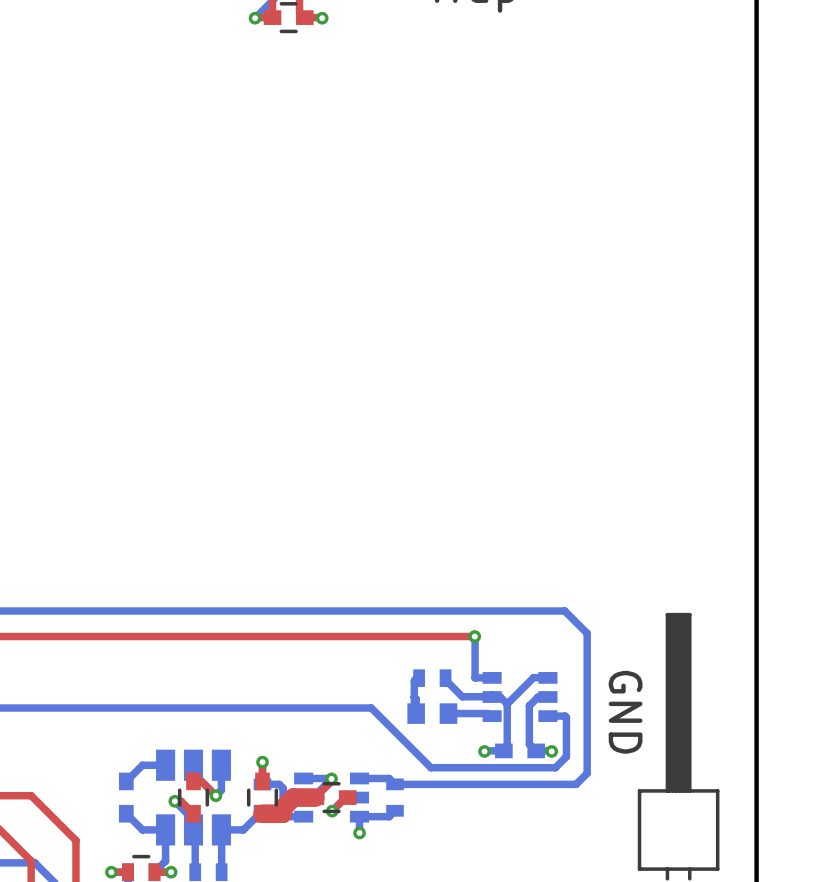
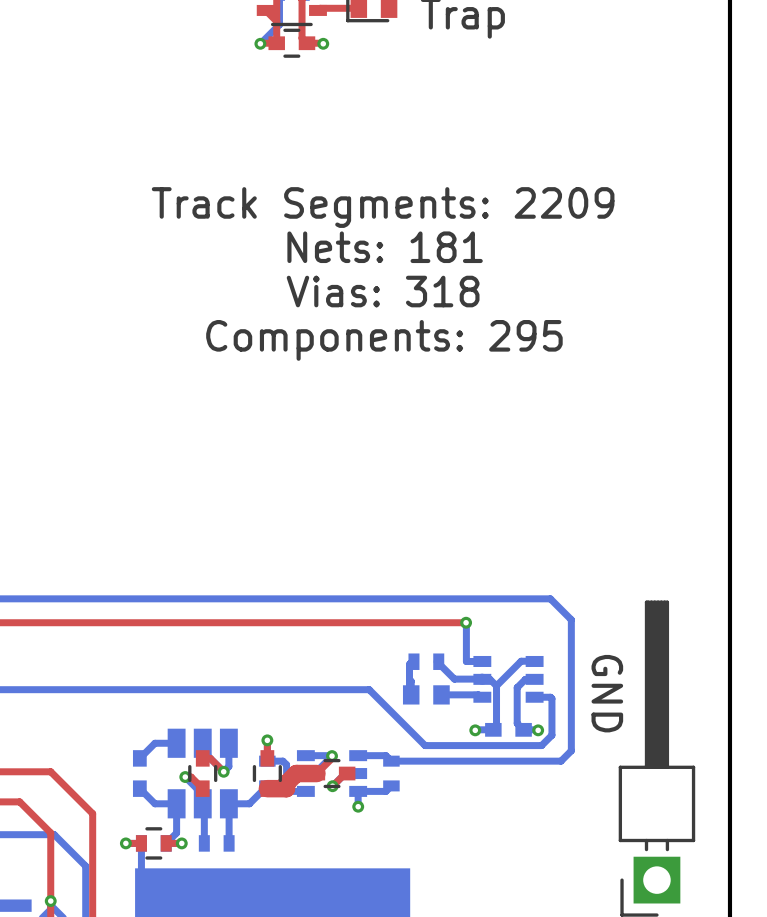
text: none -> Track Segments: 2209 (383, 207)
text: none -> Nets: 181 (385, 247)
text: none -> Vias: 318 (383, 291)
text: none -> Components: 295 (384, 340)

